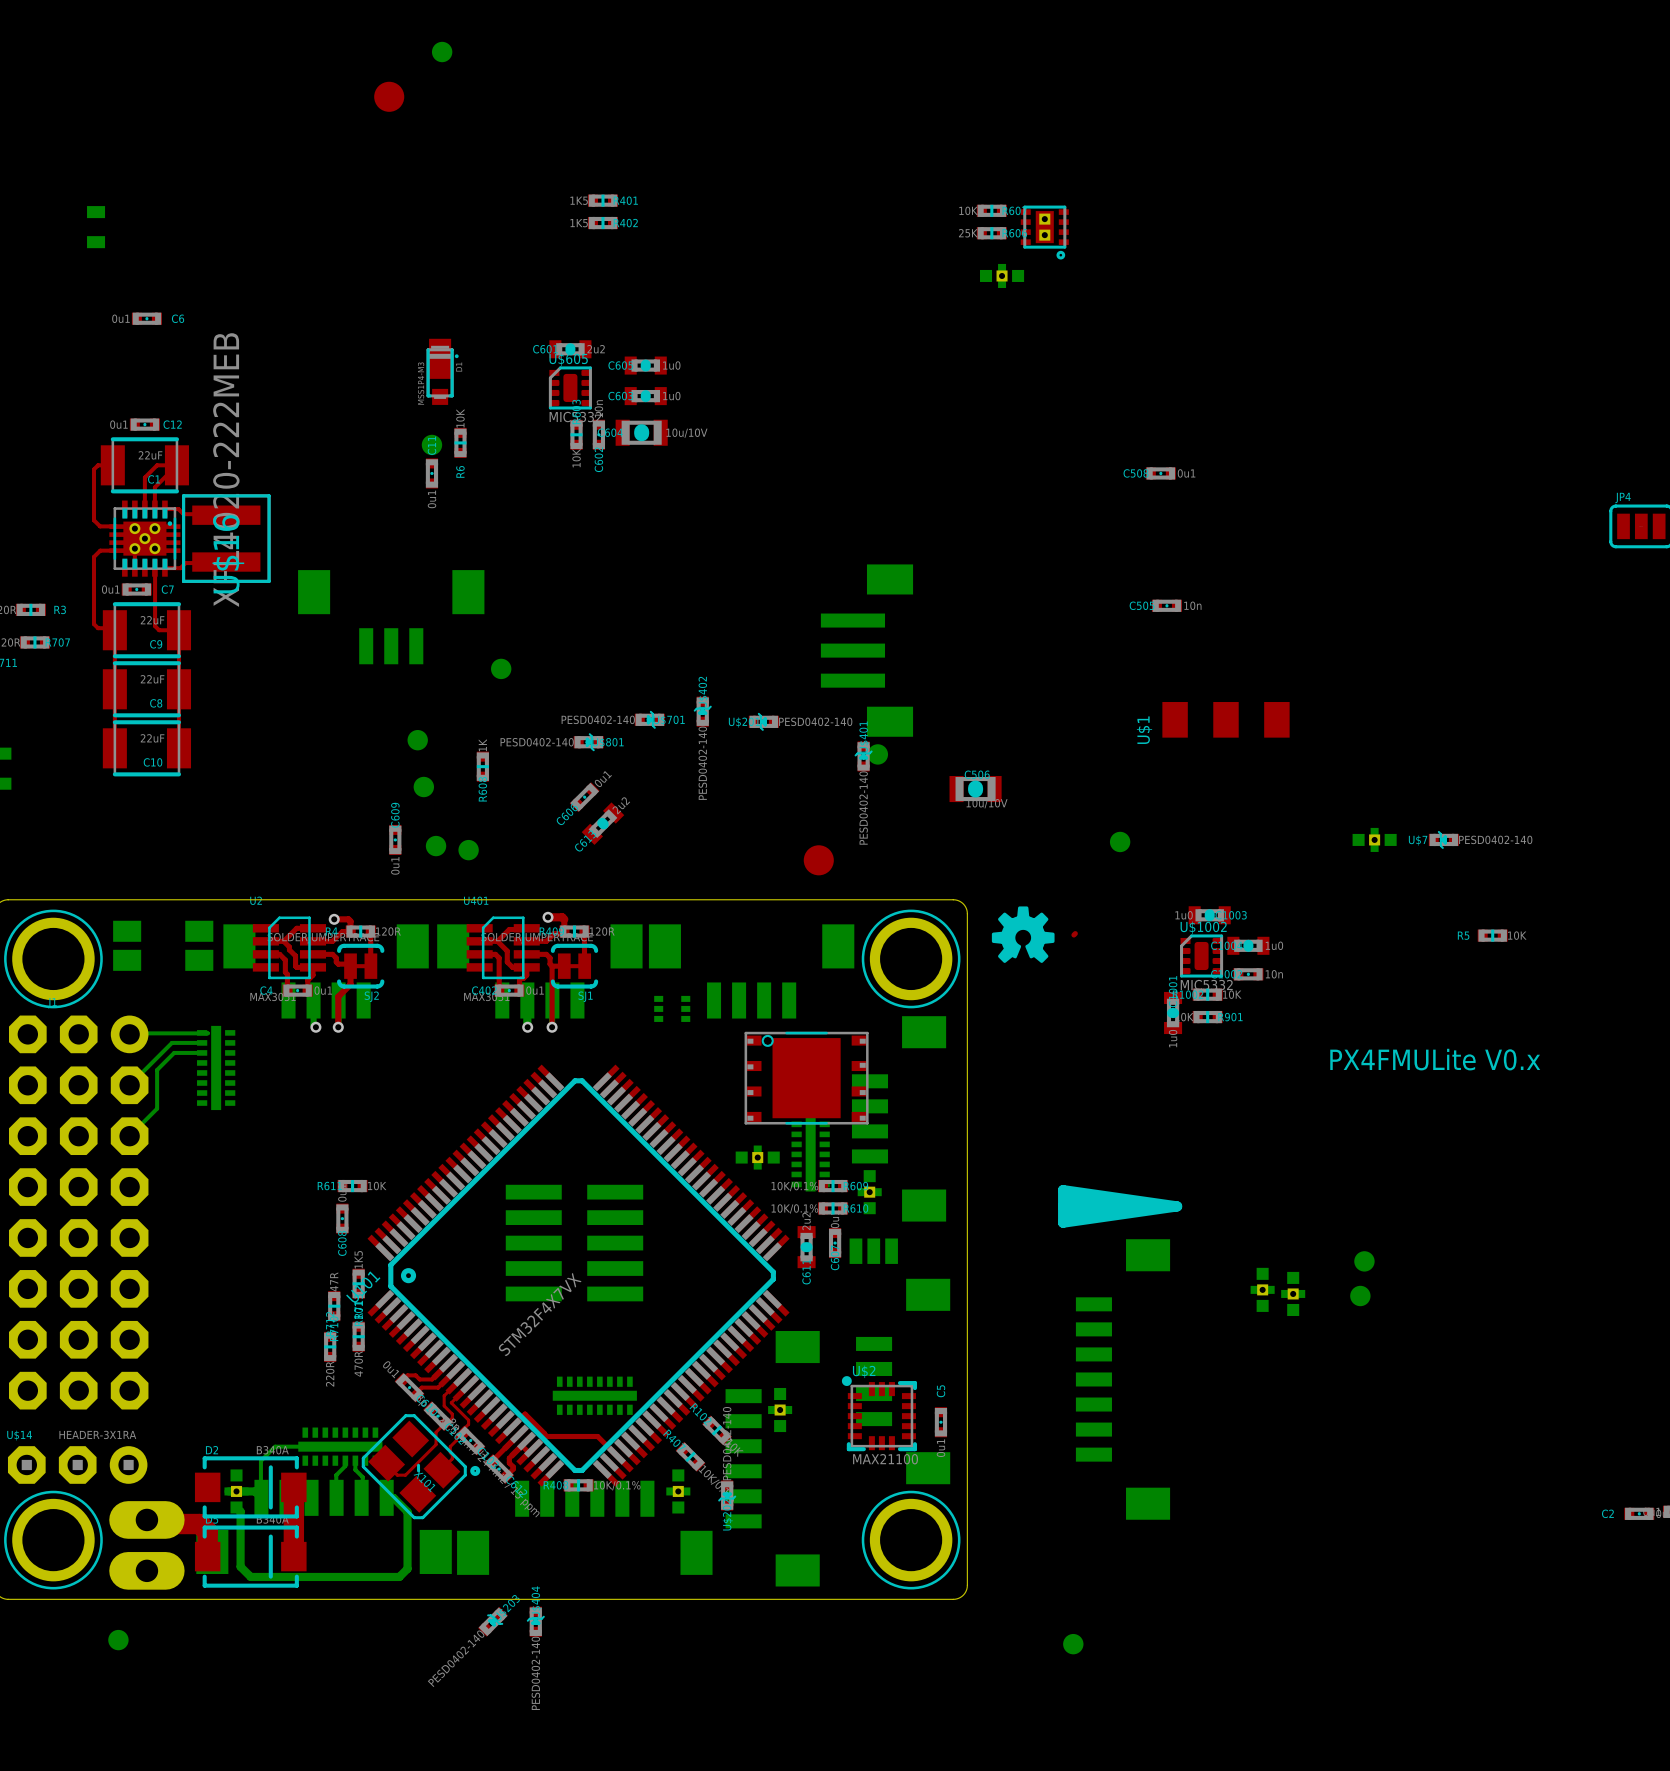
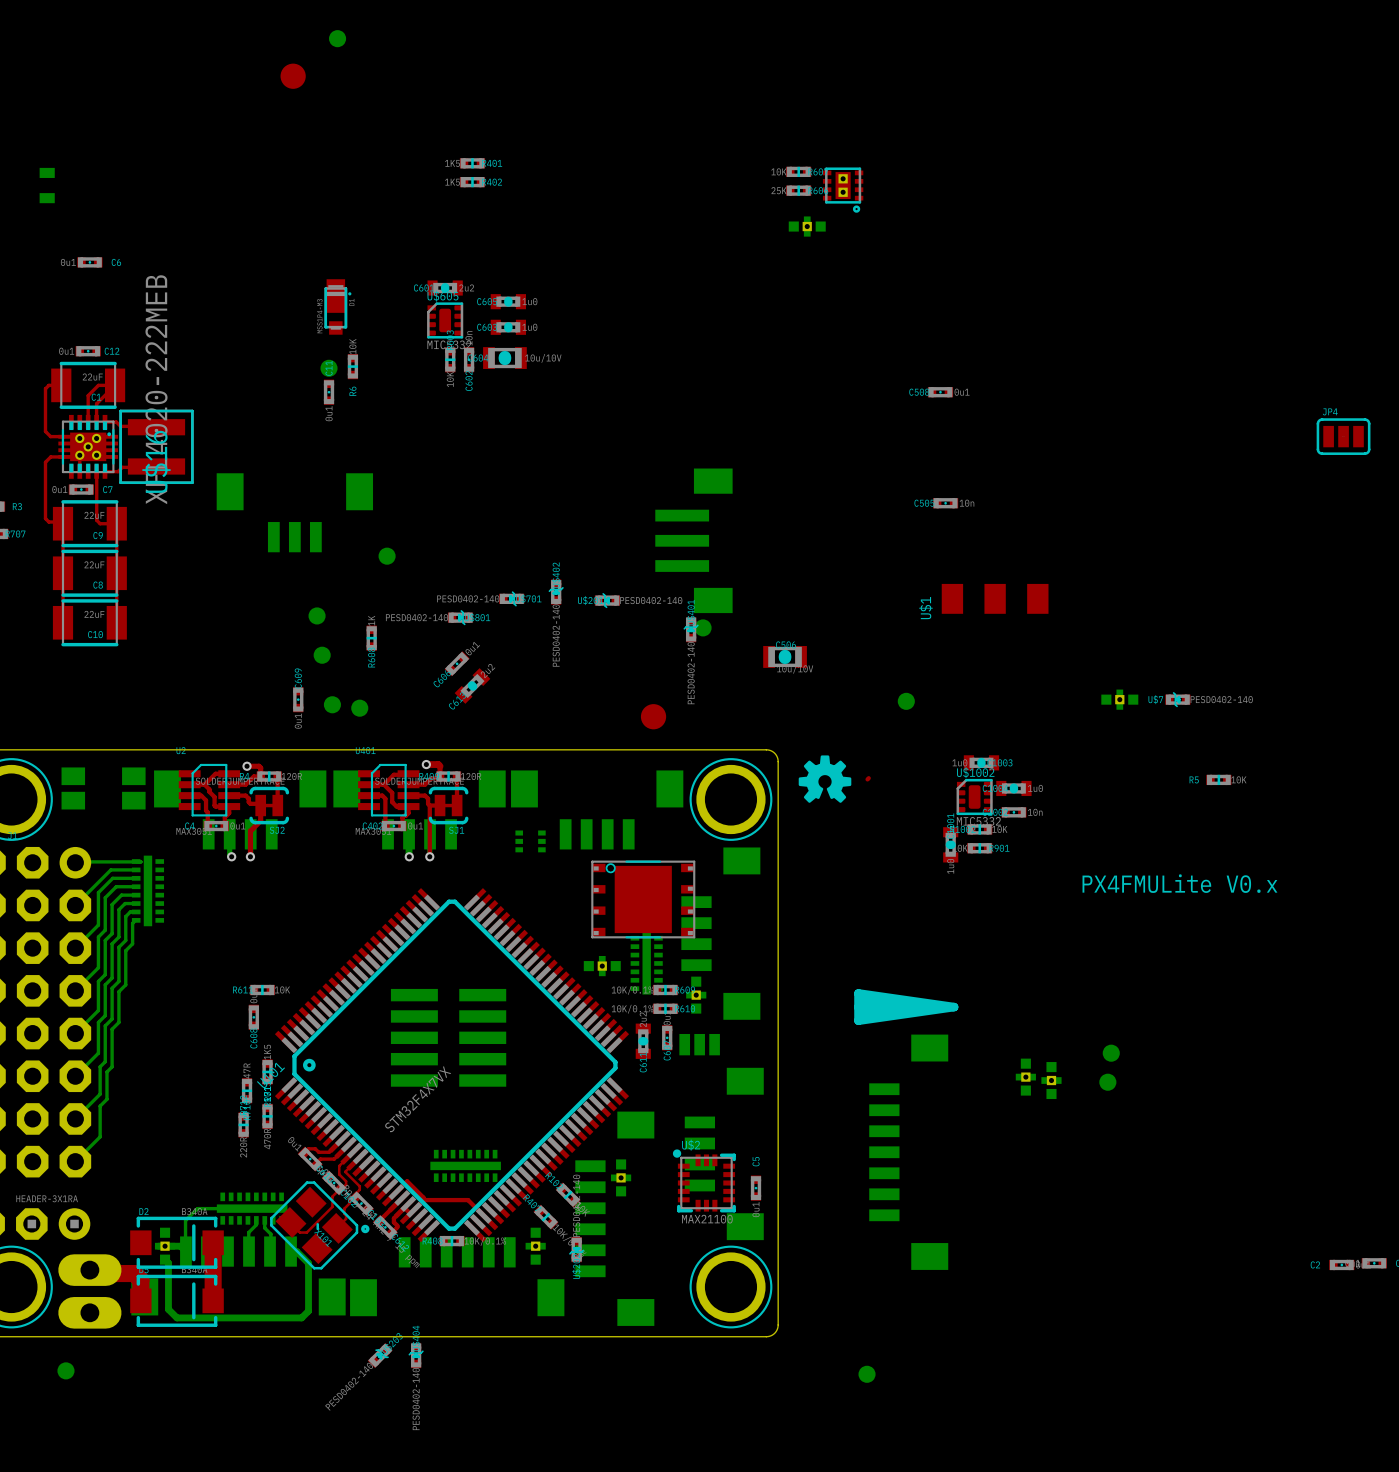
bottom track: none -> (136, 886) (116, 886) (105, 897) (105, 930) (98, 937) (98, 967) (75, 990)
bottom track: none -> (136, 895) (121, 895) (112, 904) (112, 933) (105, 940) (105, 974) (98, 981) (98, 1010) (75, 1033)
bottom track: none -> (136, 903) (125, 903) (118, 909) (118, 937) (112, 943) (112, 978) (105, 984) (105, 1015) (98, 1022) (98, 1053) (75, 1076)
bottom track: none -> (136, 911) (130, 911) (125, 916) (125, 940) (118, 947) (118, 981) (112, 988) (112, 1019) (105, 1025) (105, 1061) (100, 1066) (100, 1094) (75, 1118)
bottom track: none -> (136, 920) (132, 923) (132, 943) (125, 950) (125, 984) (118, 991) (118, 1022) (112, 1029) (112, 1066) (106, 1071) (106, 1099) (100, 1106) (100, 1136) (75, 1161)

